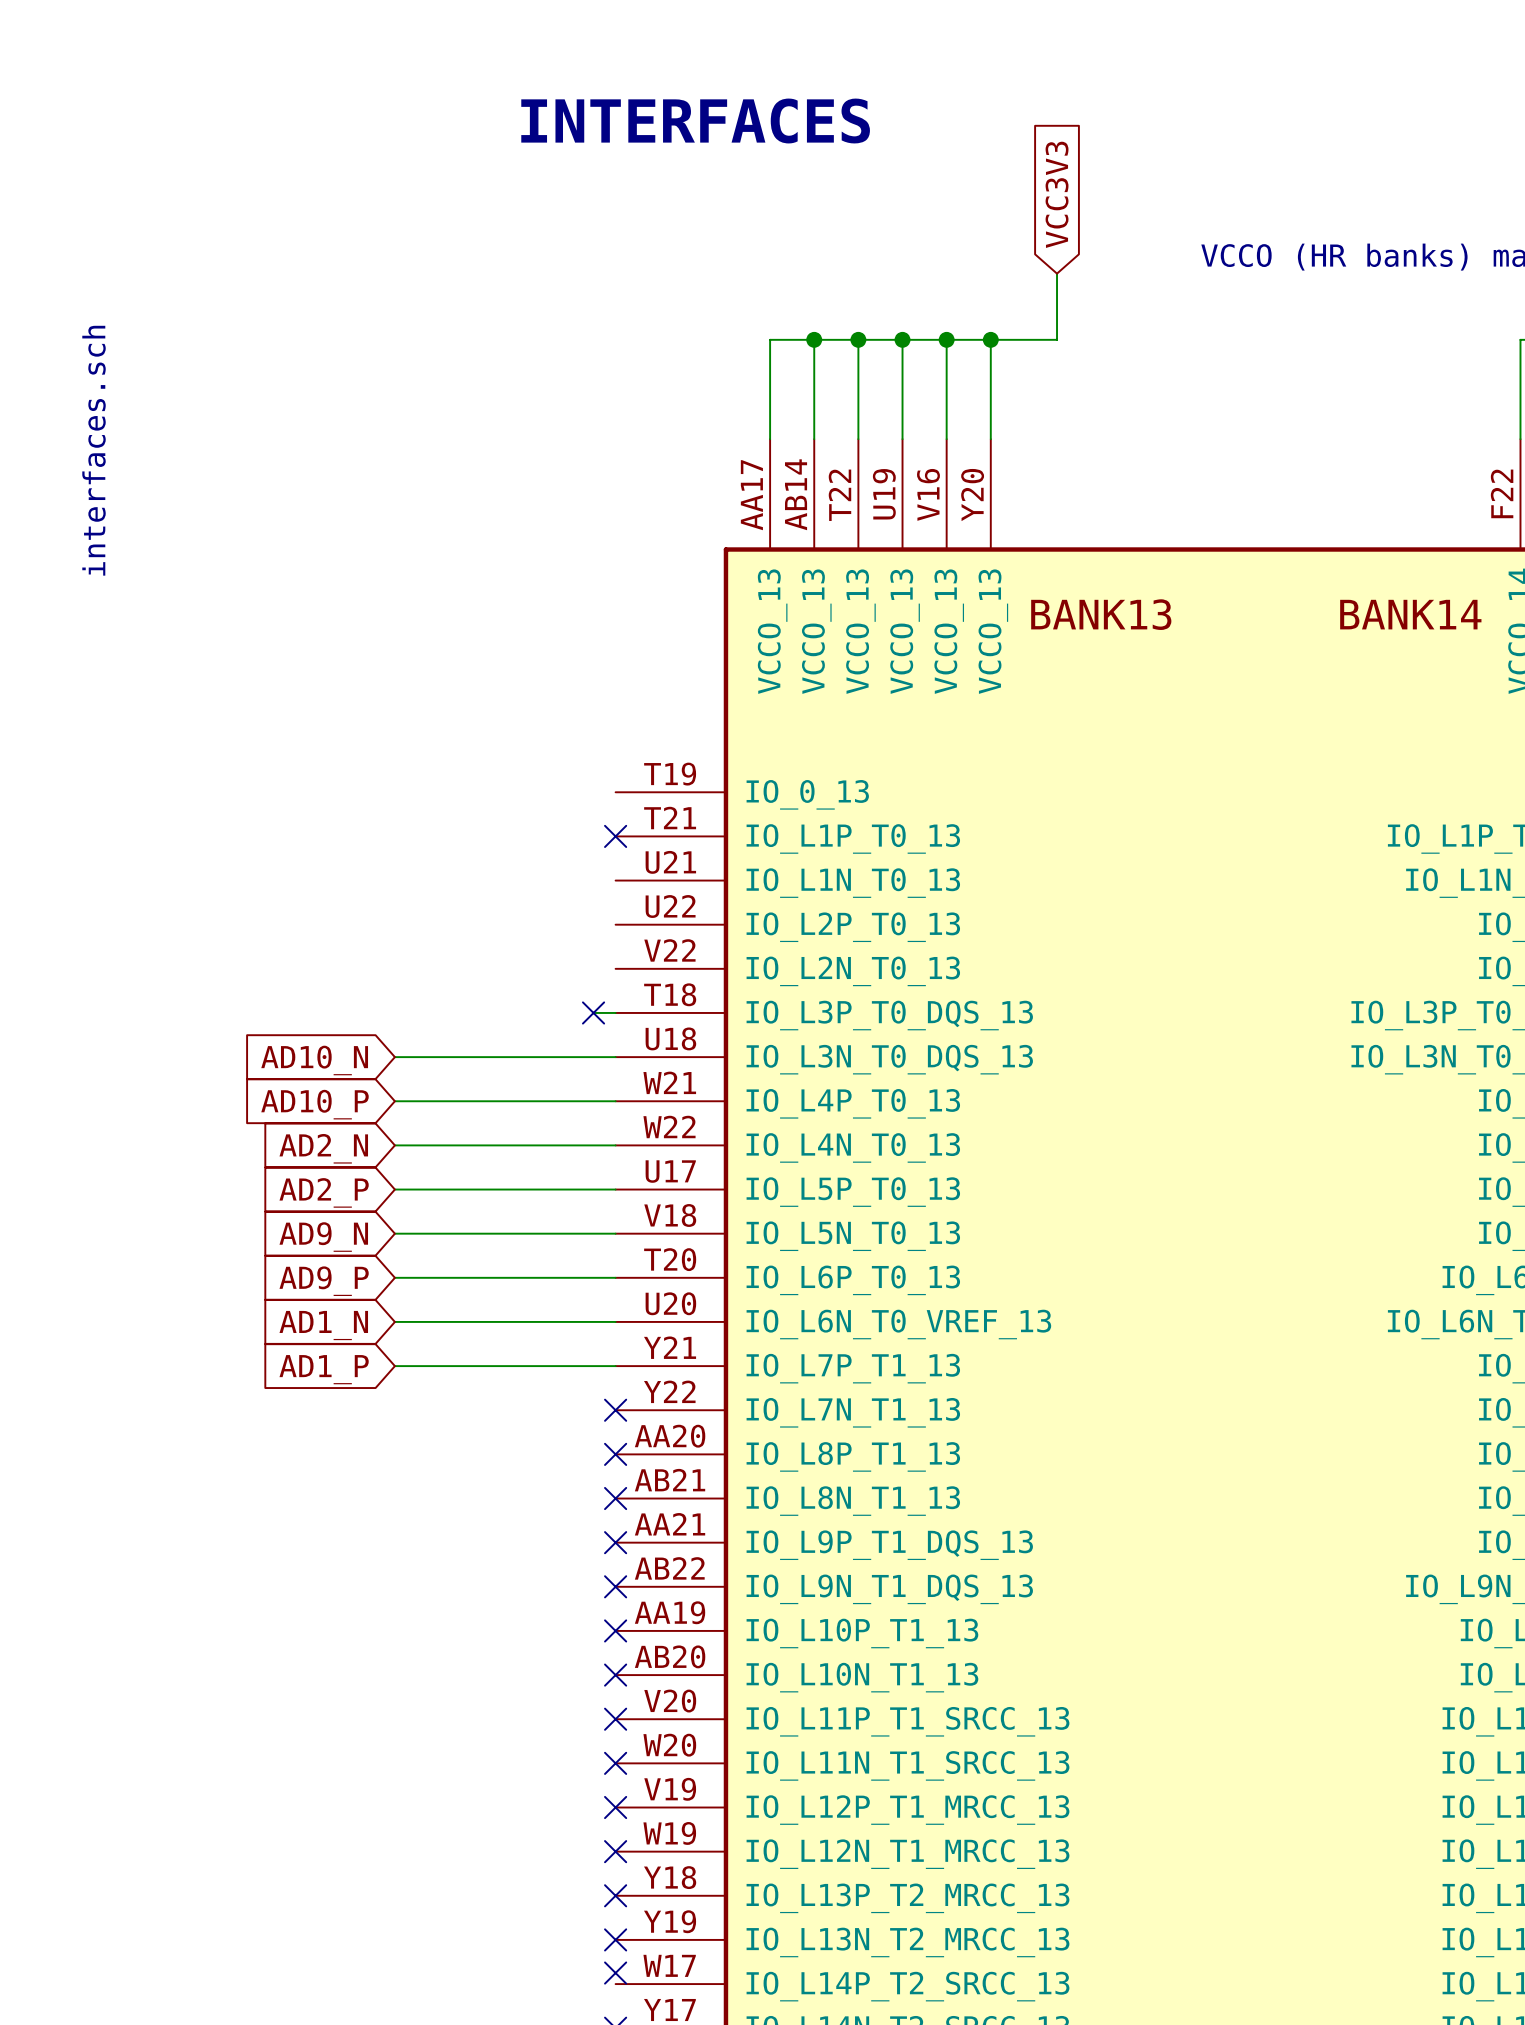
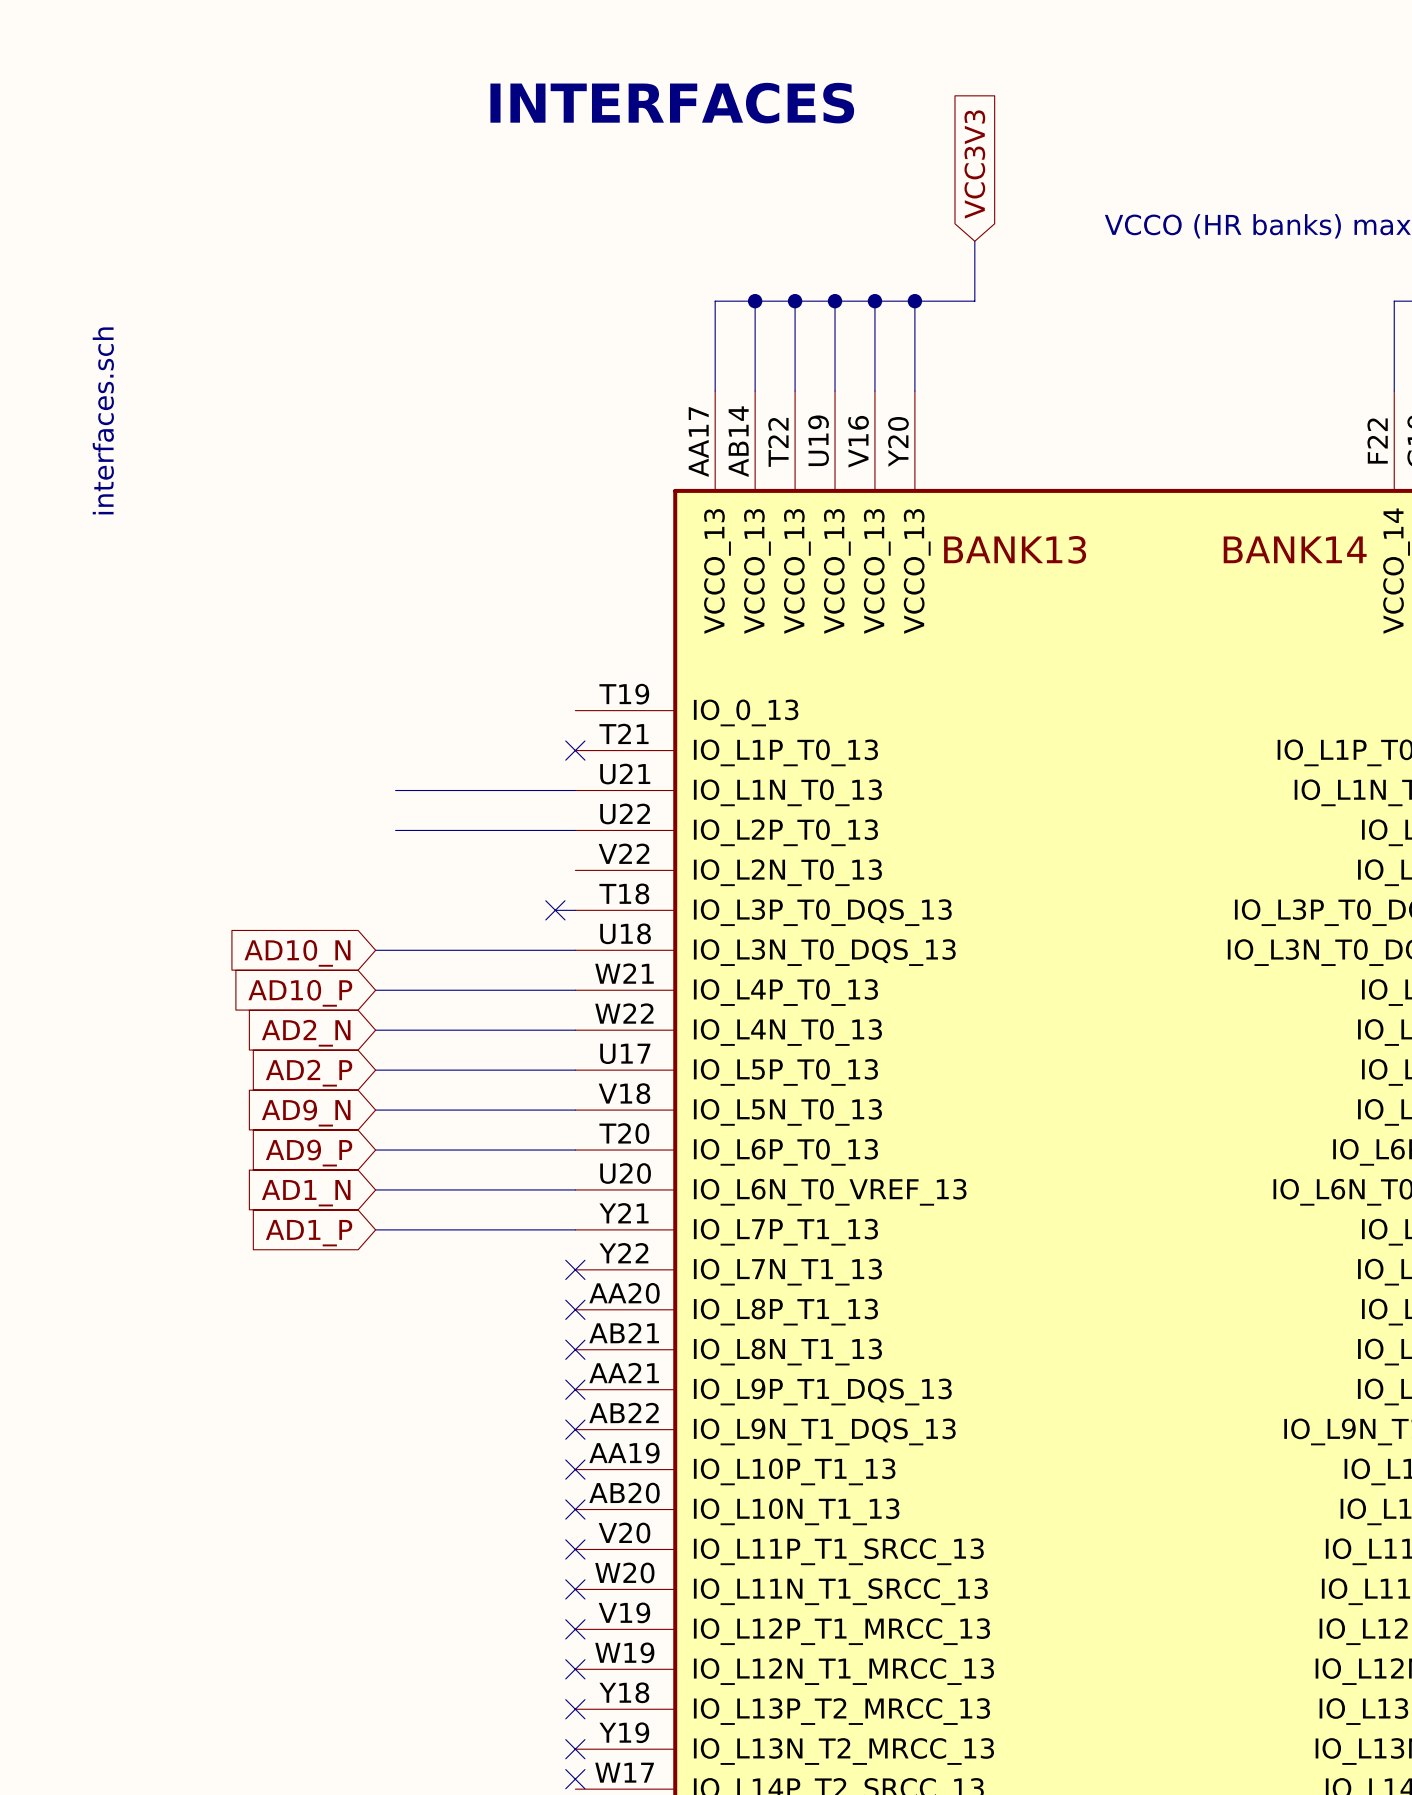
wire: none -> (395, 790) (575, 790)
wire: none -> (395, 830) (575, 830)

